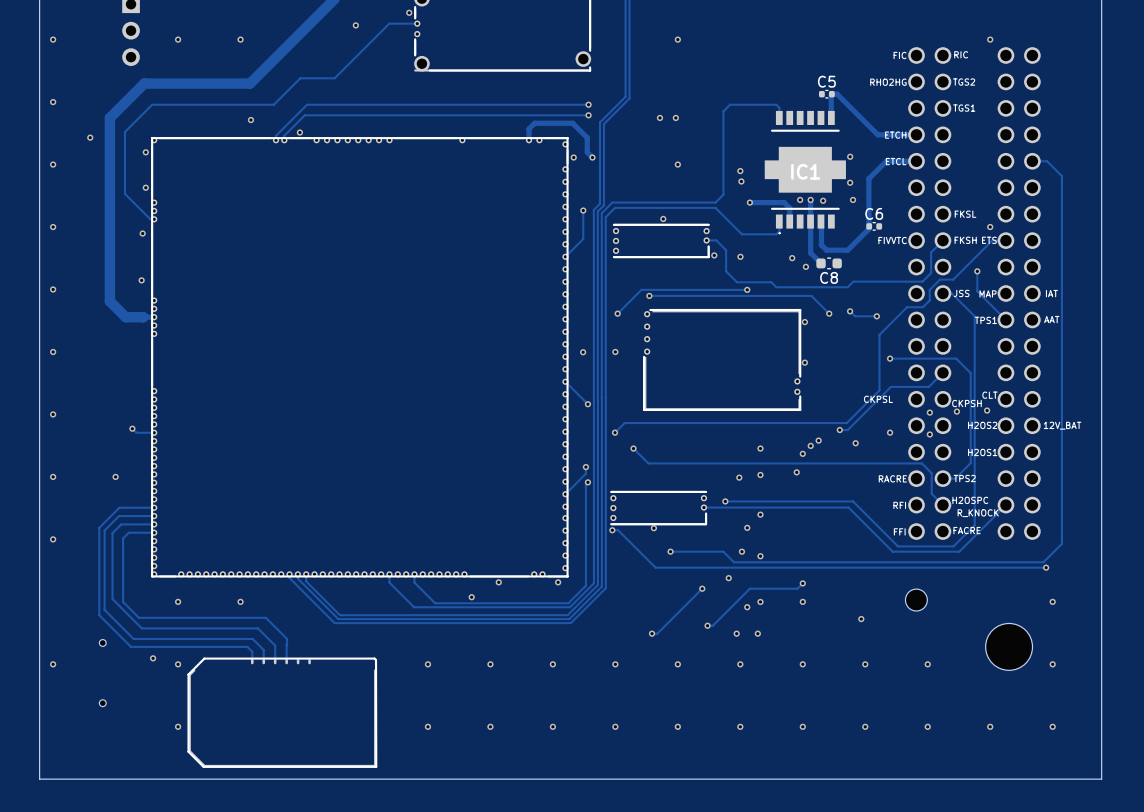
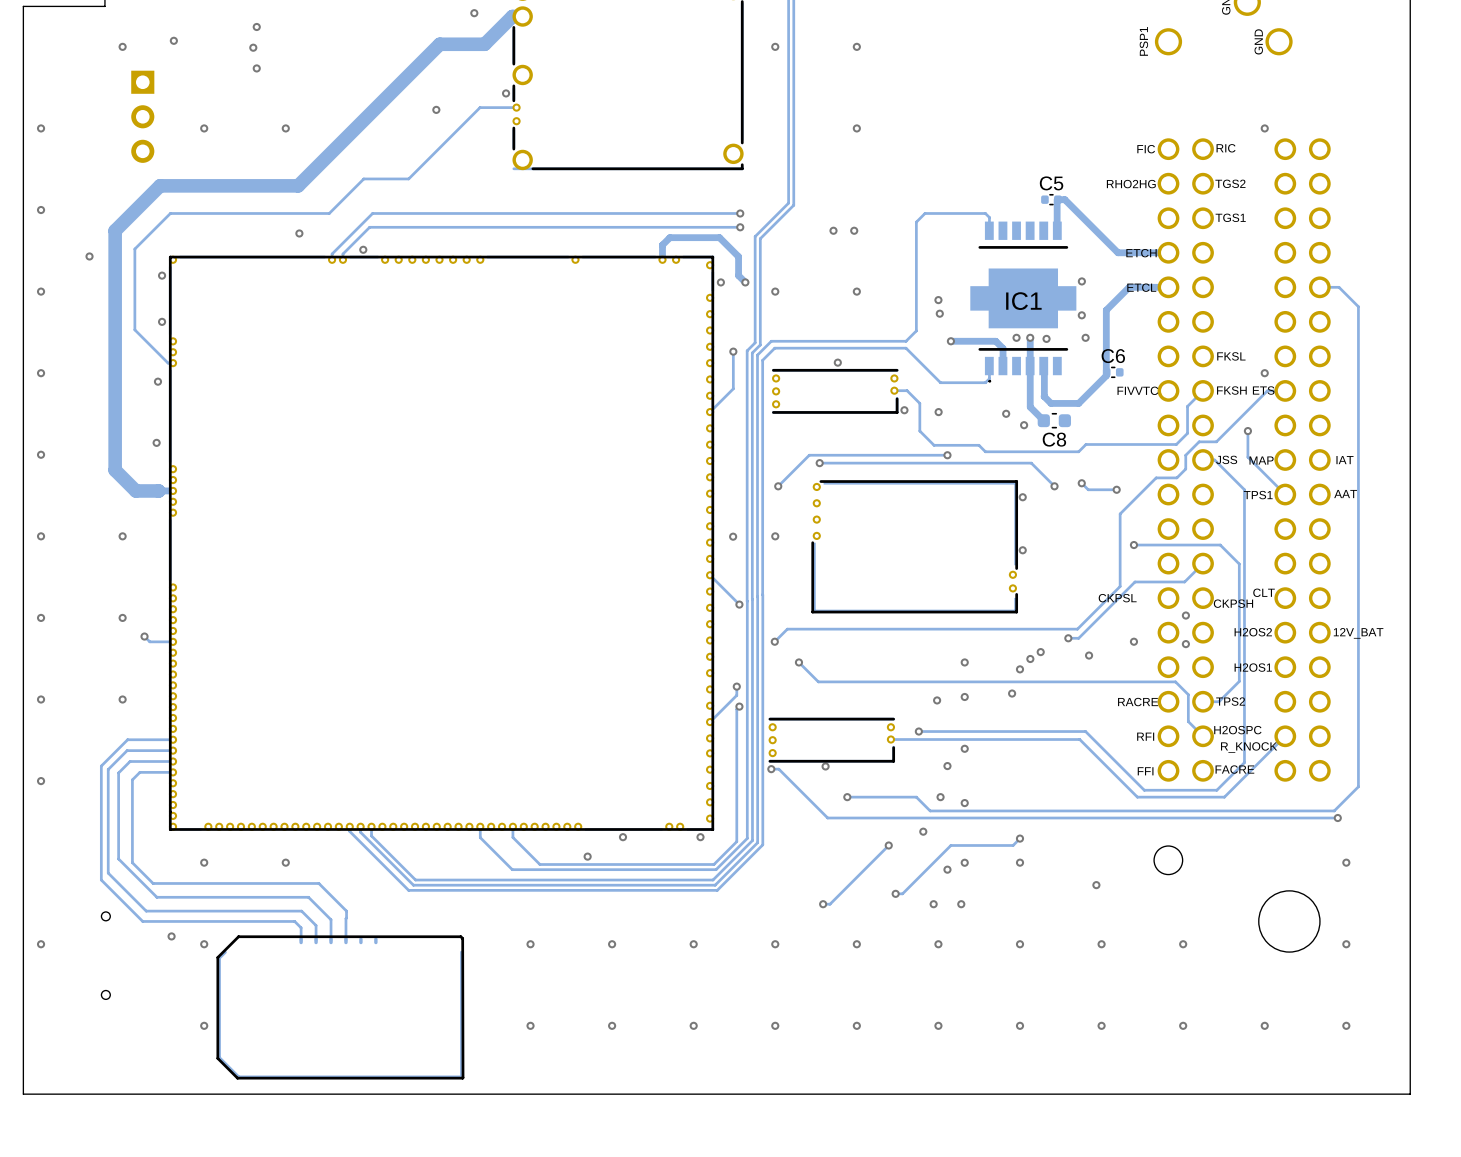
via: none -> (775, 291)
via: none -> (122, 536)
via: (987, 410) -> none
via: (956, 411) -> none
via: none -> (122, 617)

